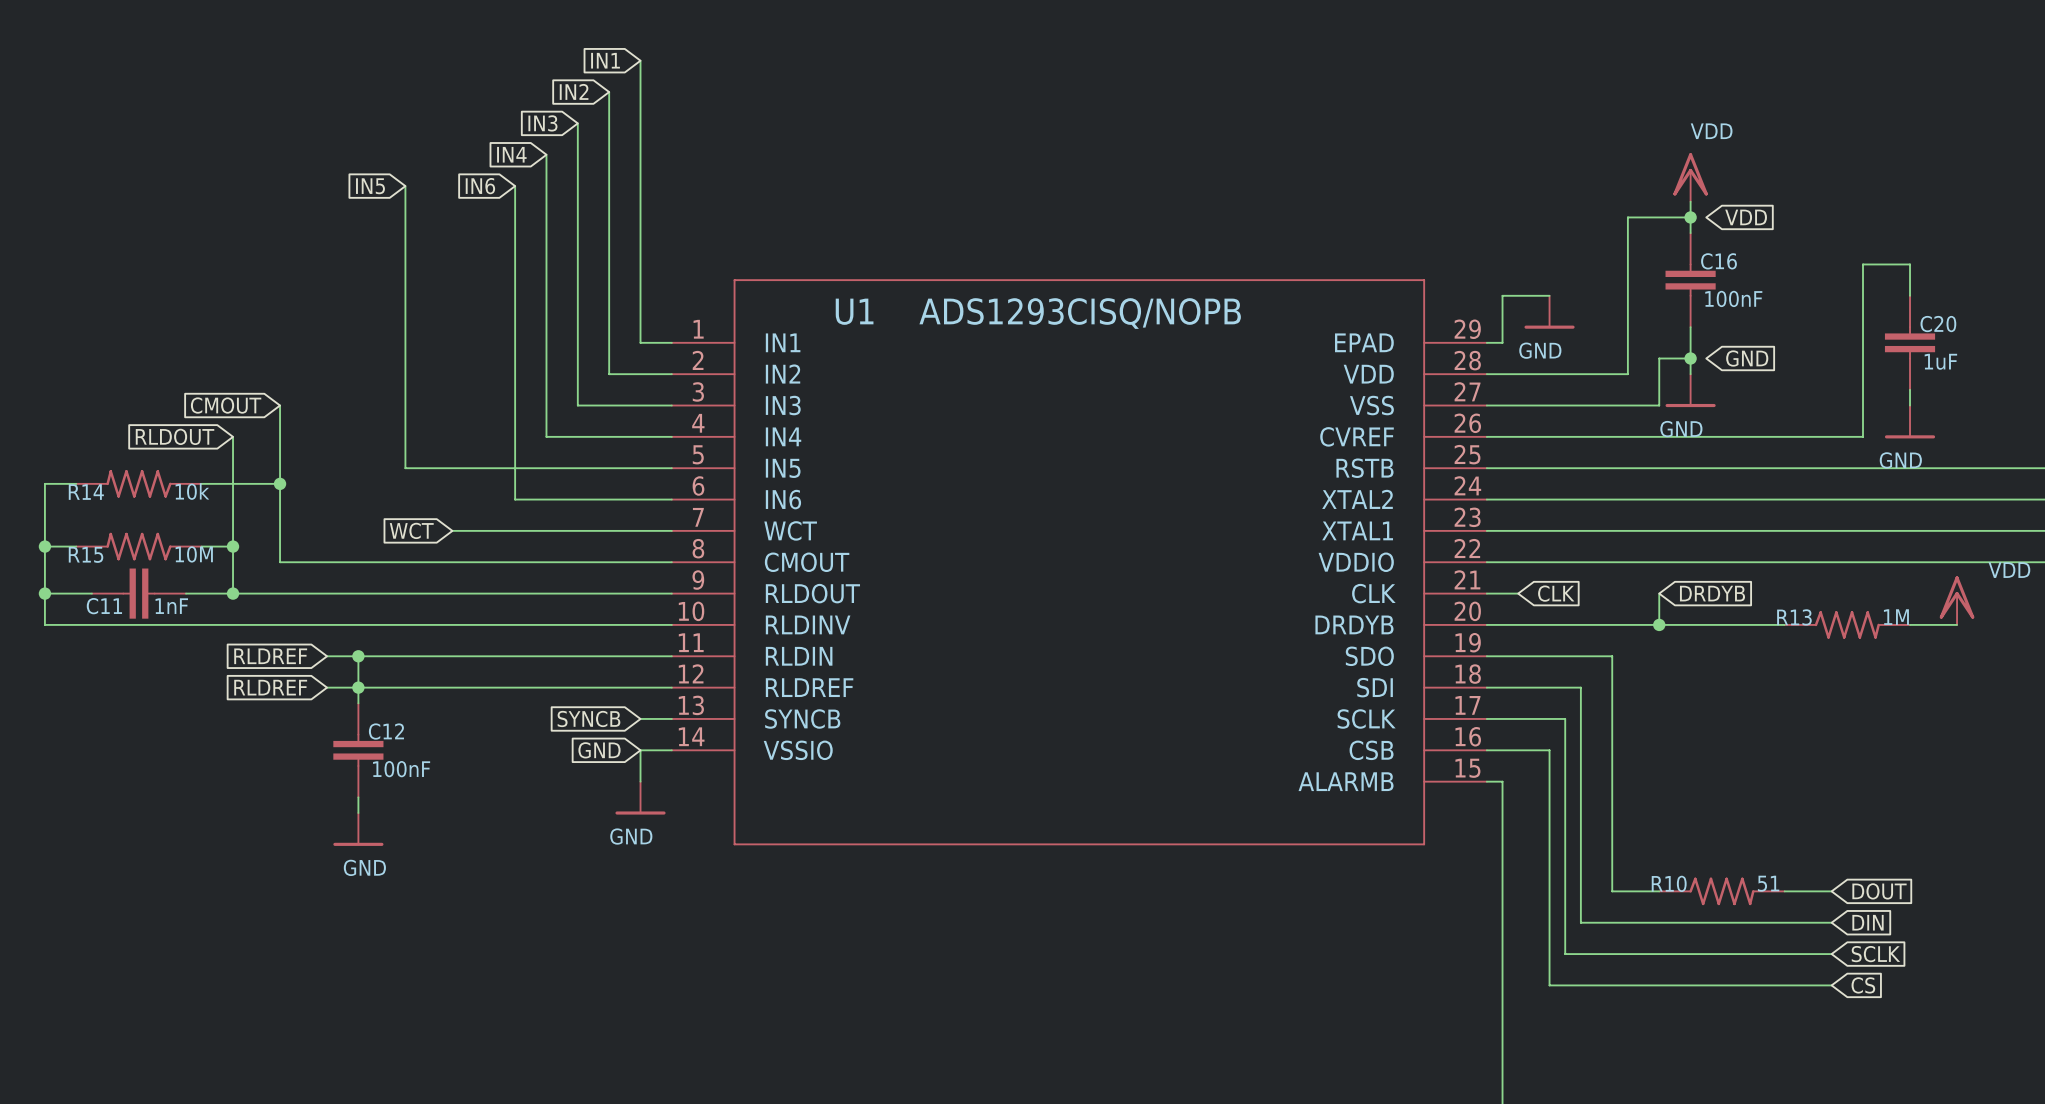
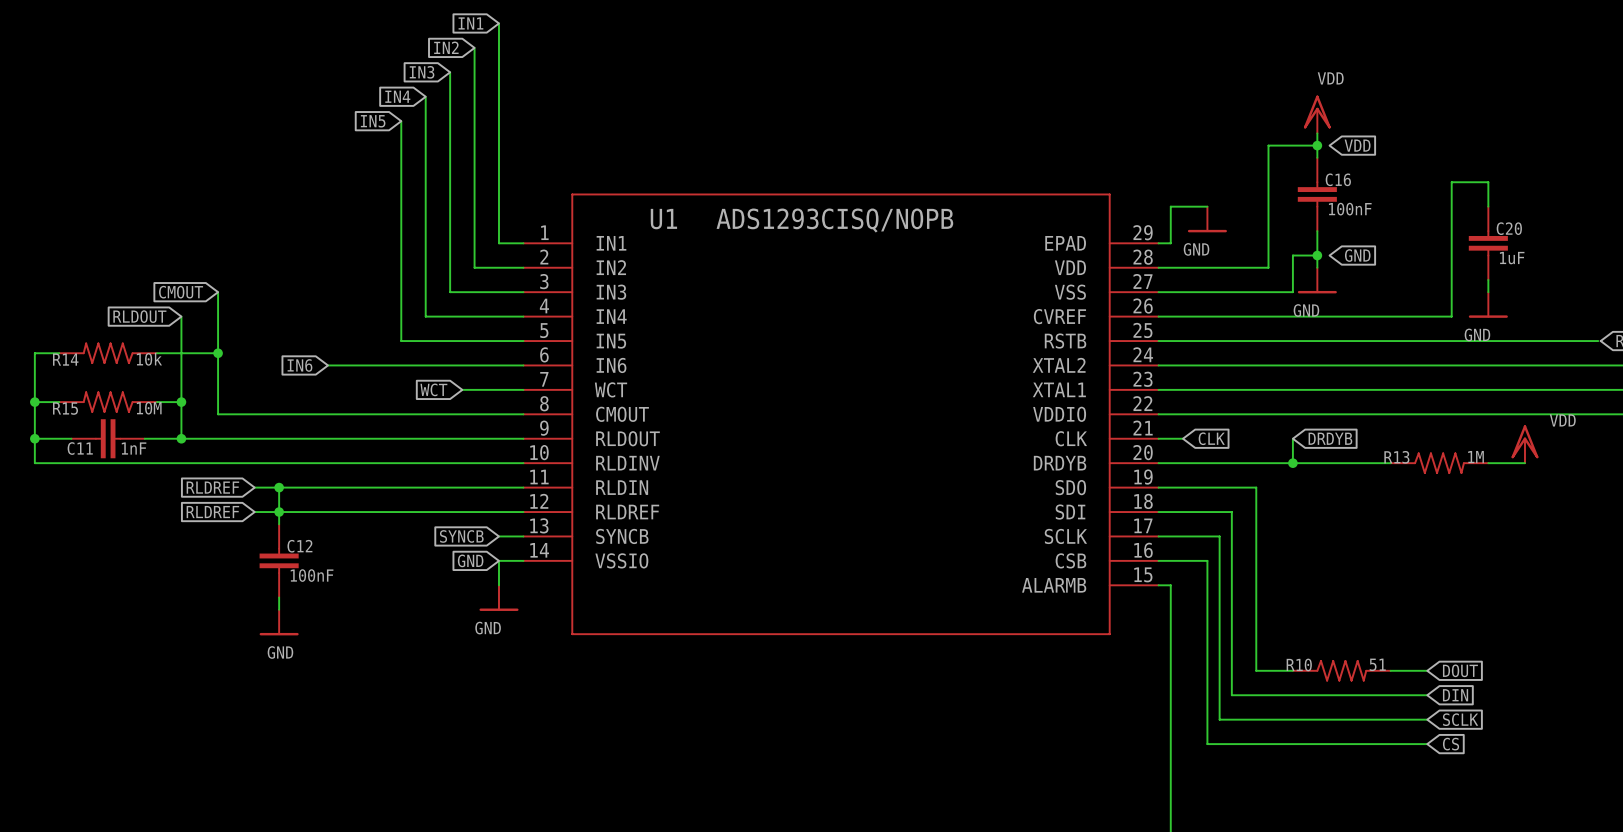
global label: IN5 (370, 186) -> none
wire: (405, 186) (405, 468) (515, 468) (515, 499) -> (327, 365) (401, 365)
global label: IN6 (480, 186) -> IN5 (373, 121)
global label: none -> IN6 (299, 365)
global label position: WCT (411, 530) -> WCT (433, 389)
wire: (452, 530) (593, 530) -> none

